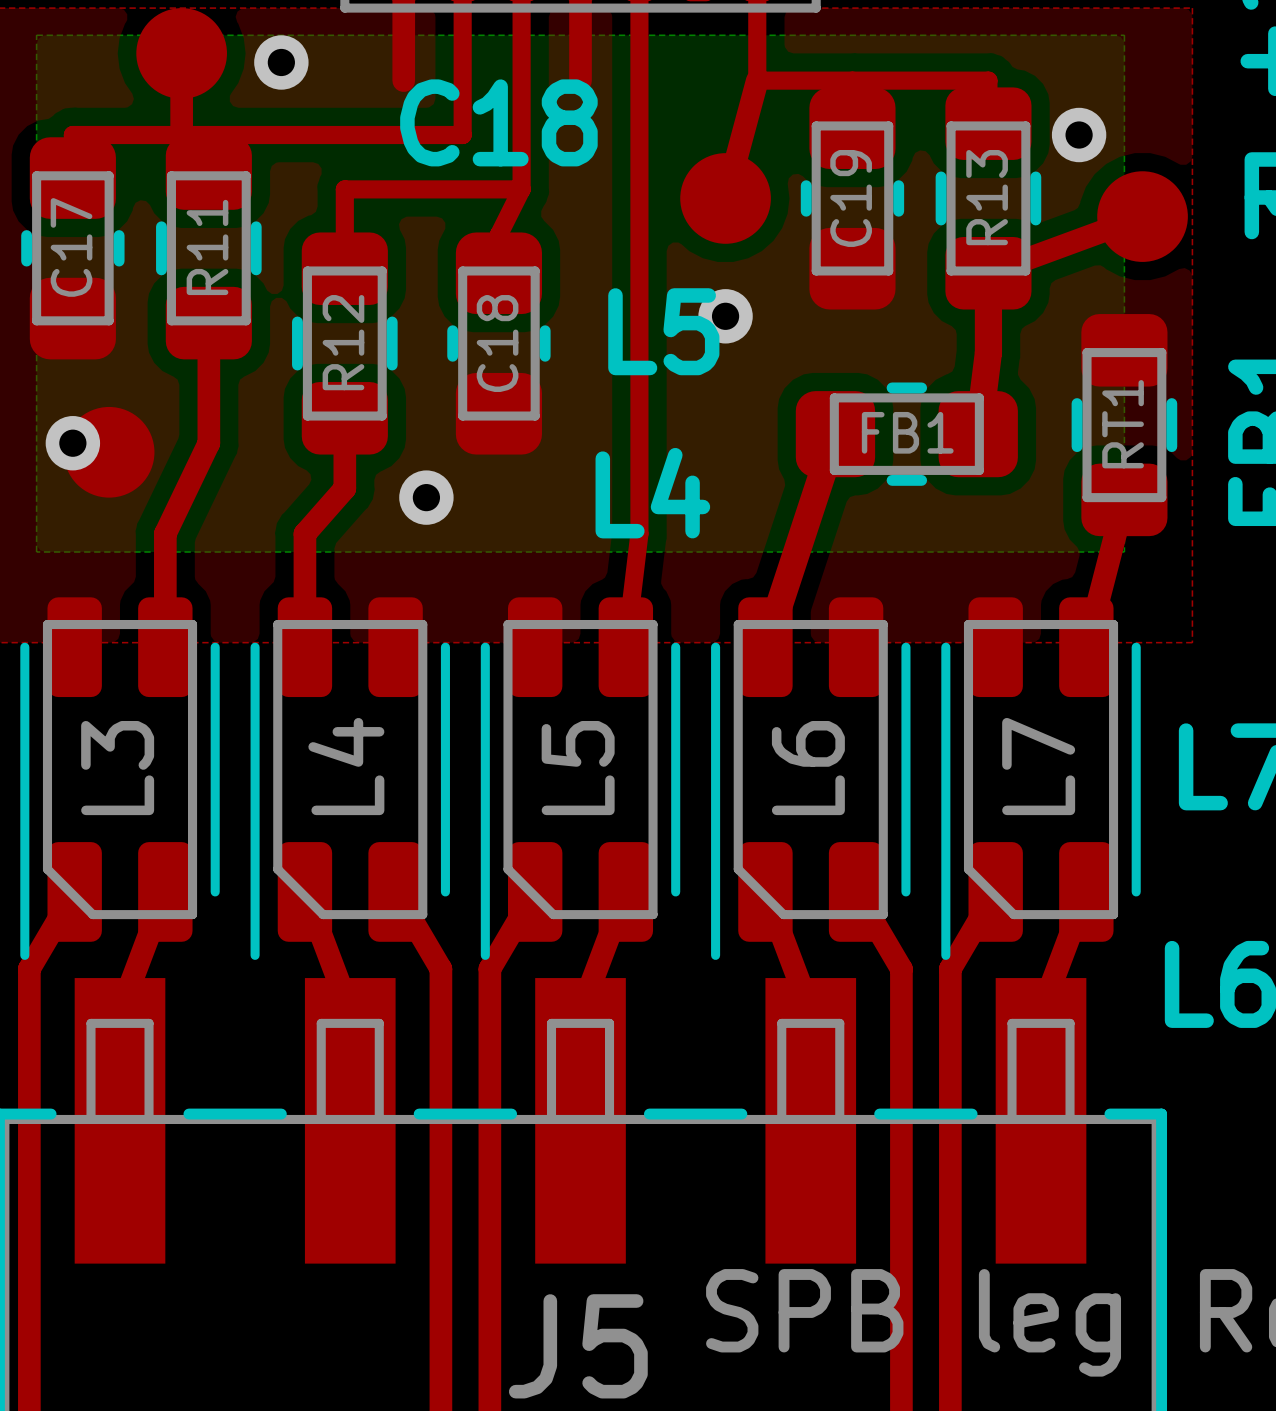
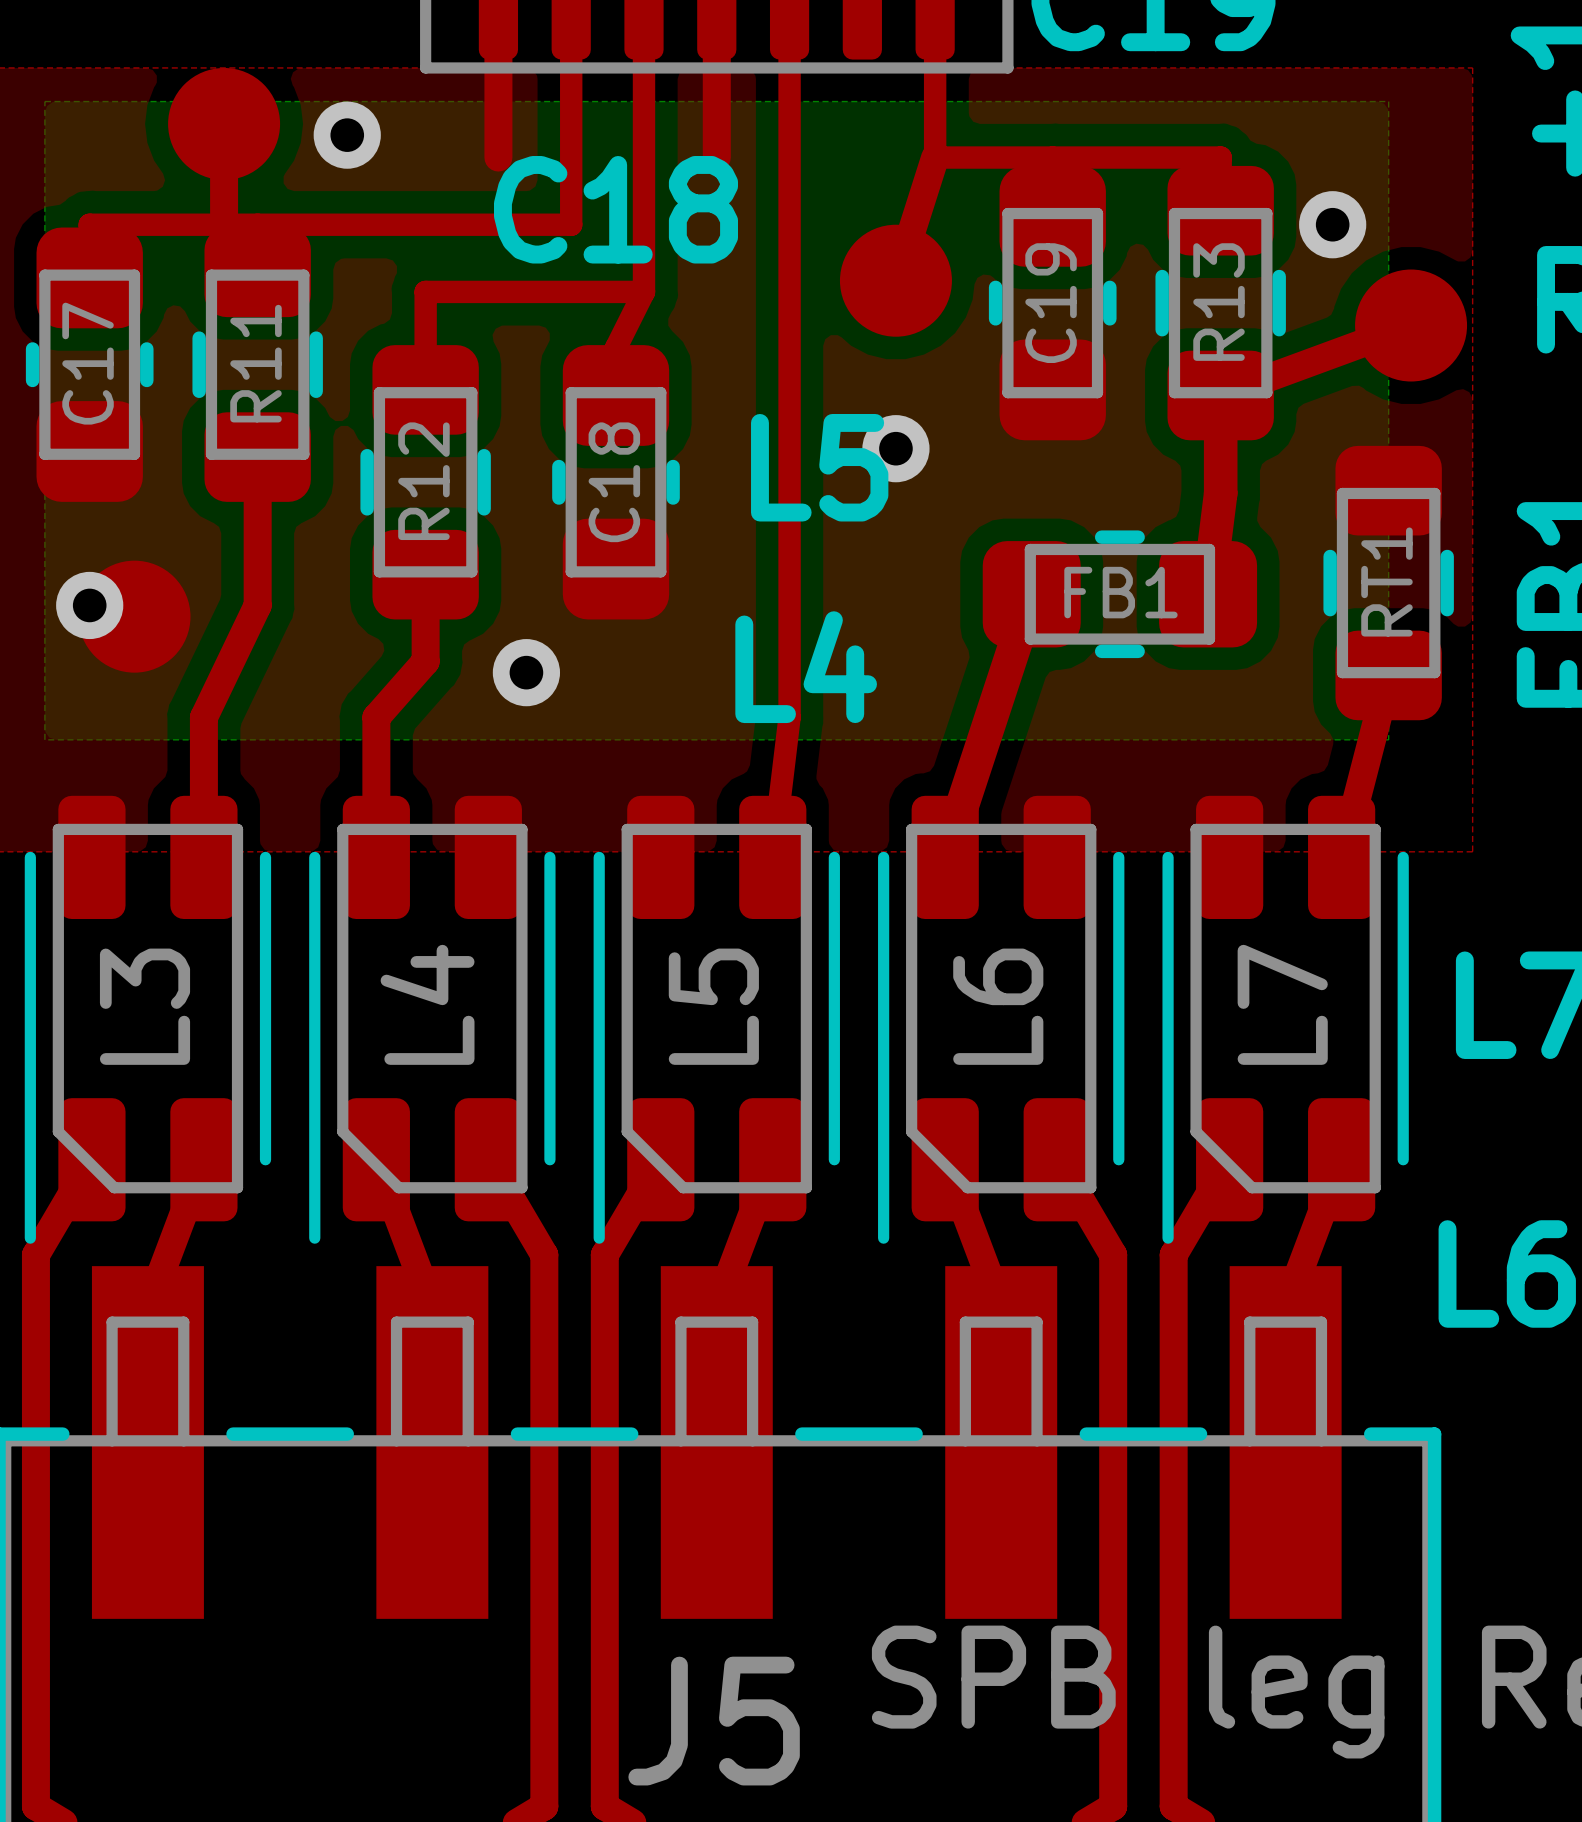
top track: (757, 80) (725, 198) -> (935, 157) (895, 280)
part position: (725, 198) -> (895, 280)

